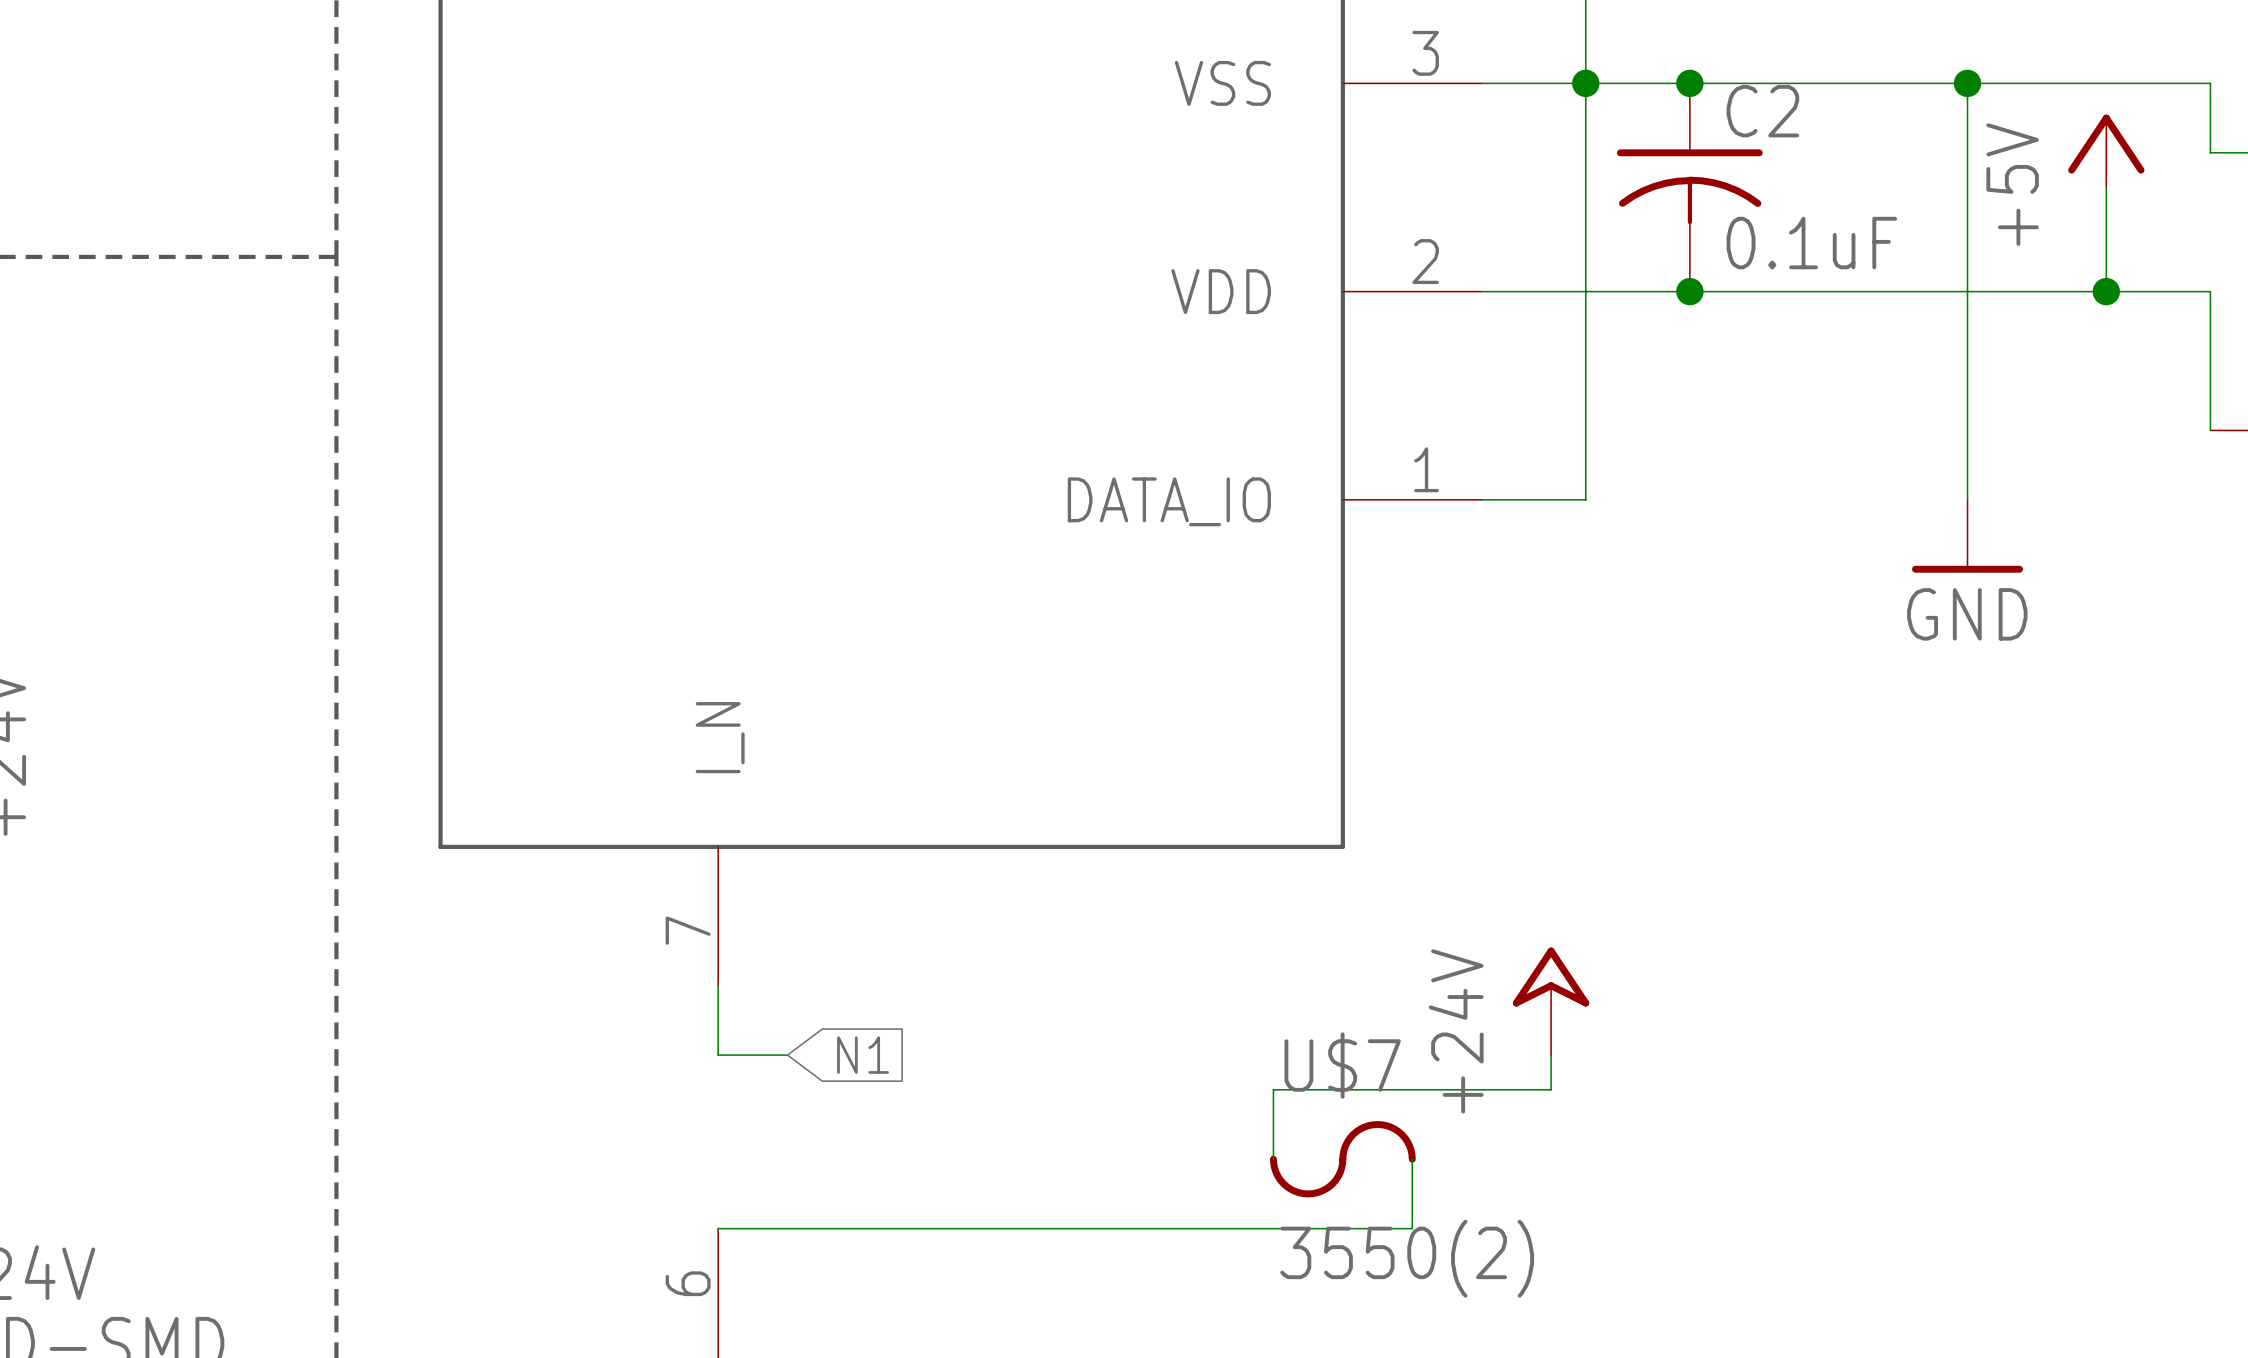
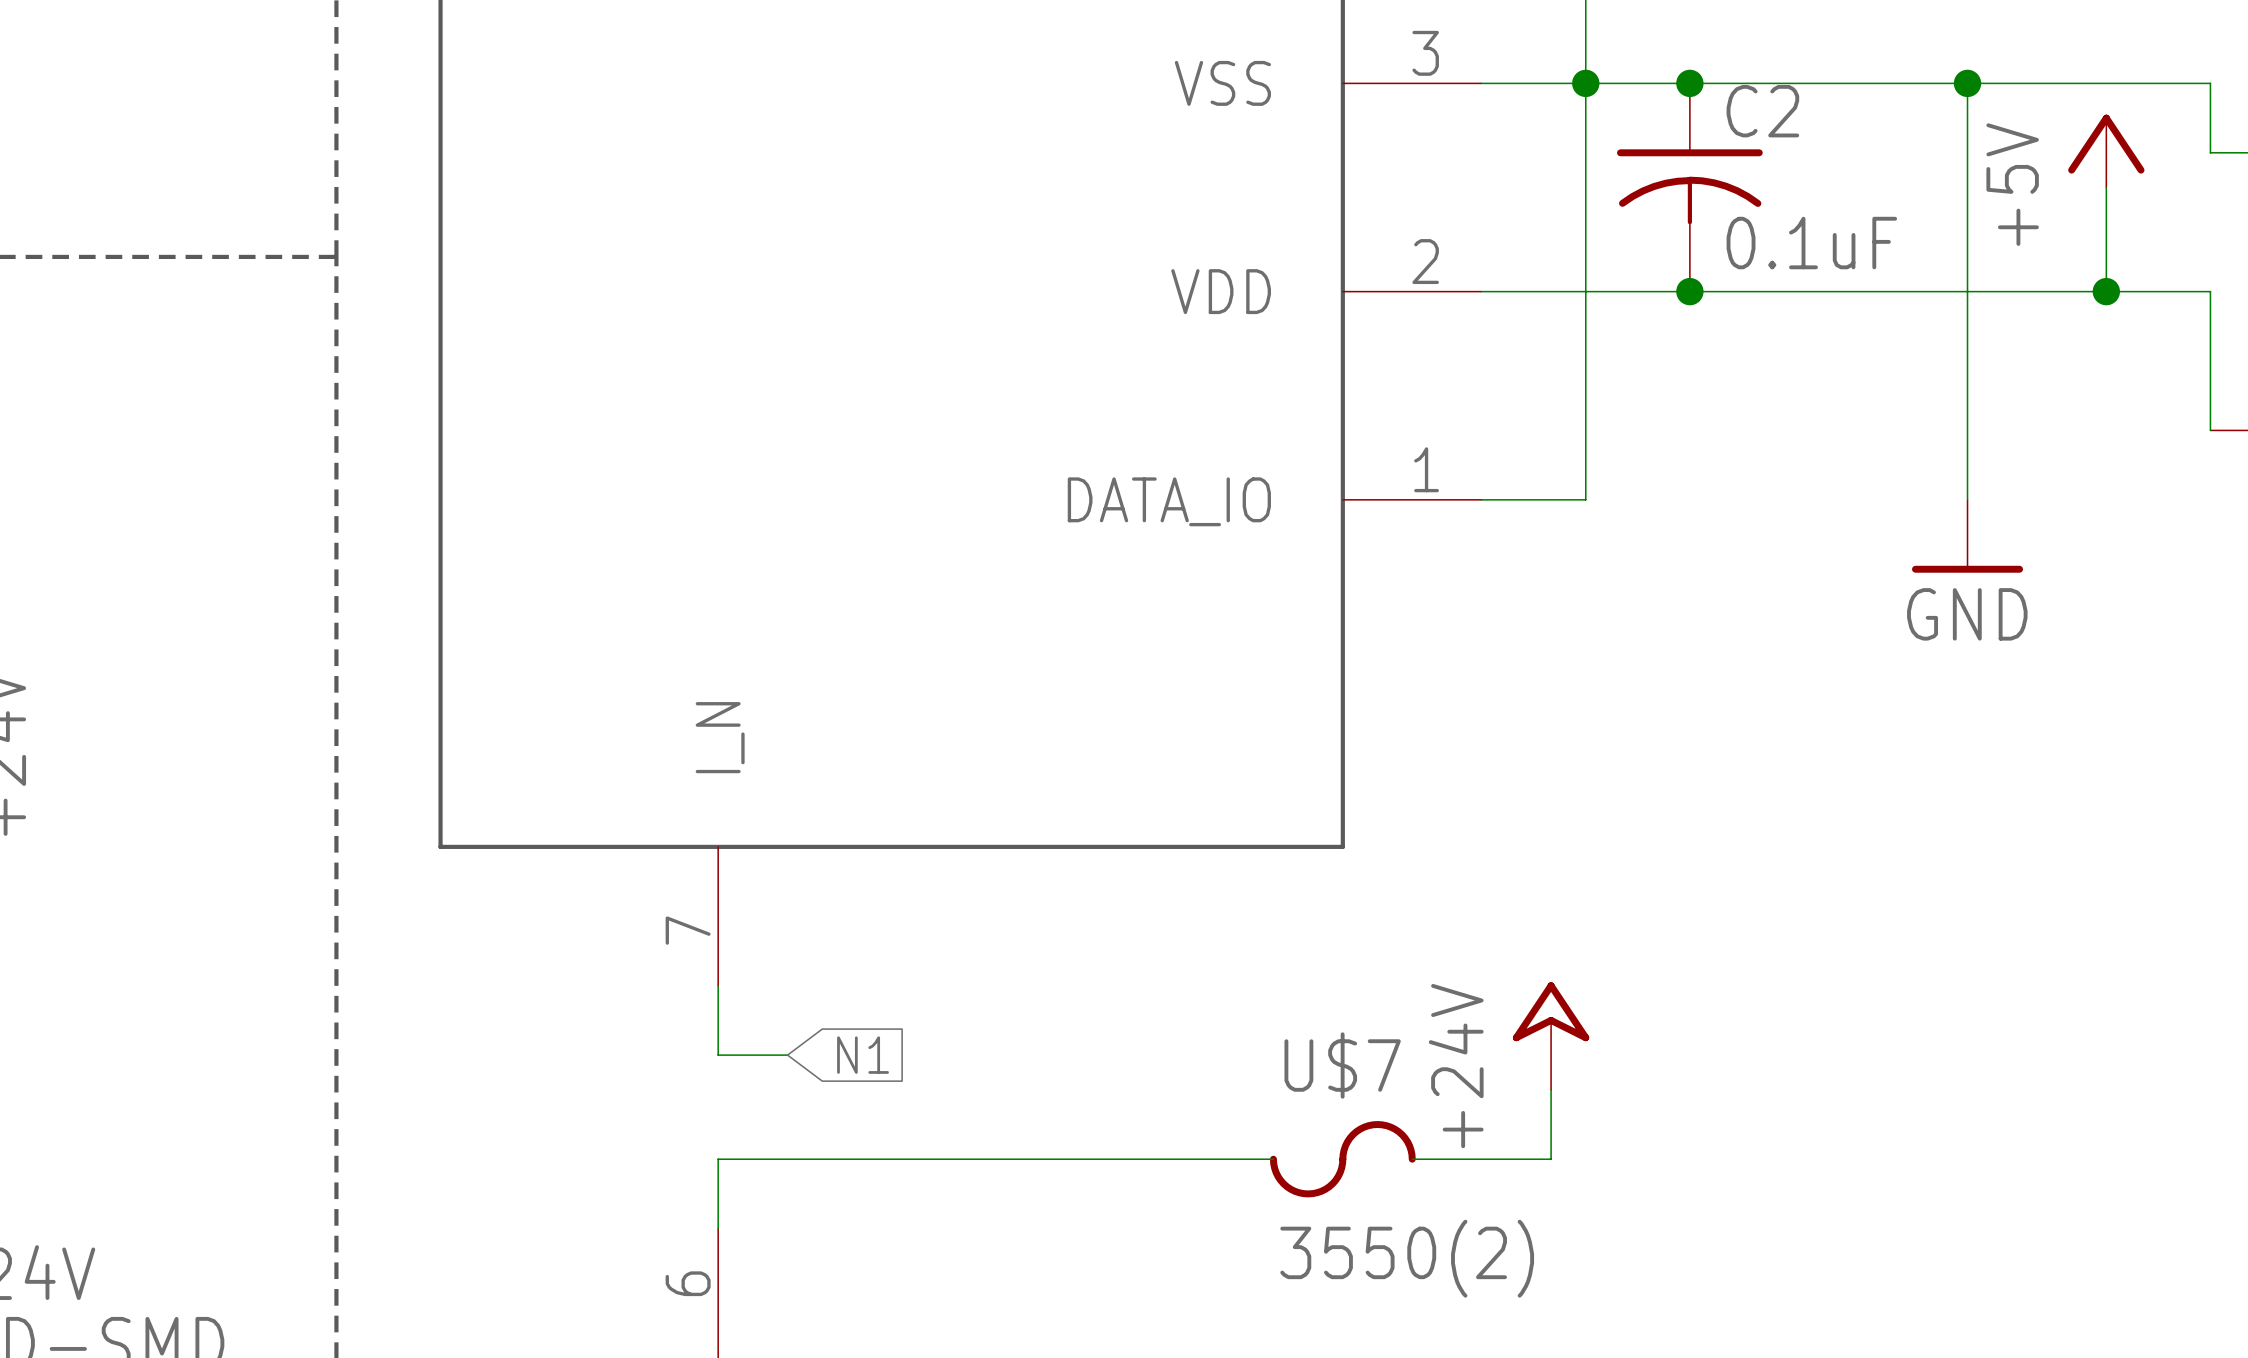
power symbol position: +24V (1551, 1001) -> +24V (1551, 1036)
wire: (1551, 1055) (1551, 1089) (1273, 1089) (1273, 1159) -> none
wire: none -> (1551, 1089) (1551, 1159) (1412, 1159)
wire: (1412, 1159) (1412, 1228) (718, 1228) -> (1273, 1159) (718, 1159) (718, 1228)

